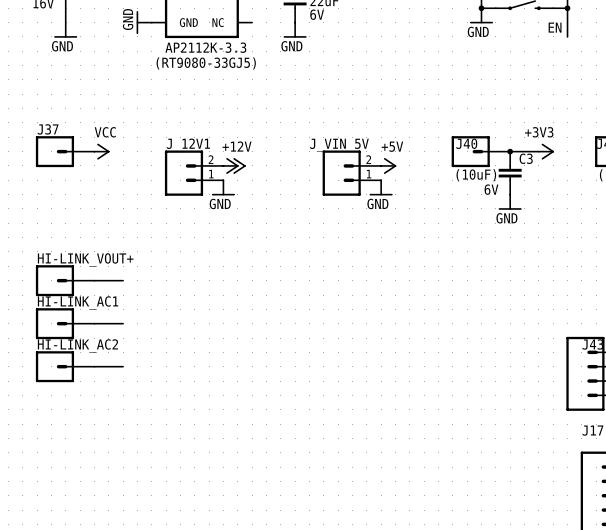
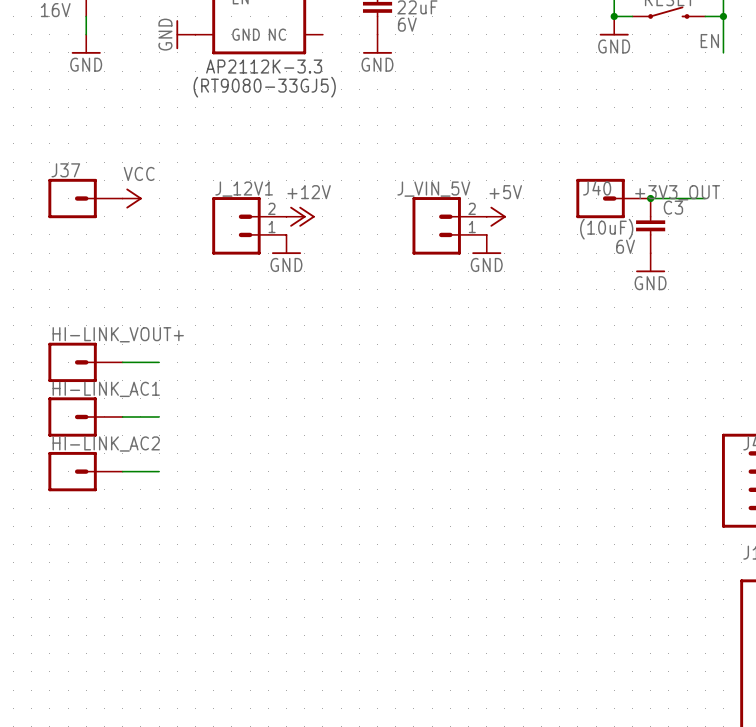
label: none -> +3V3_OUT (677, 192)
power symbol: +3V3 (546, 151) -> none

